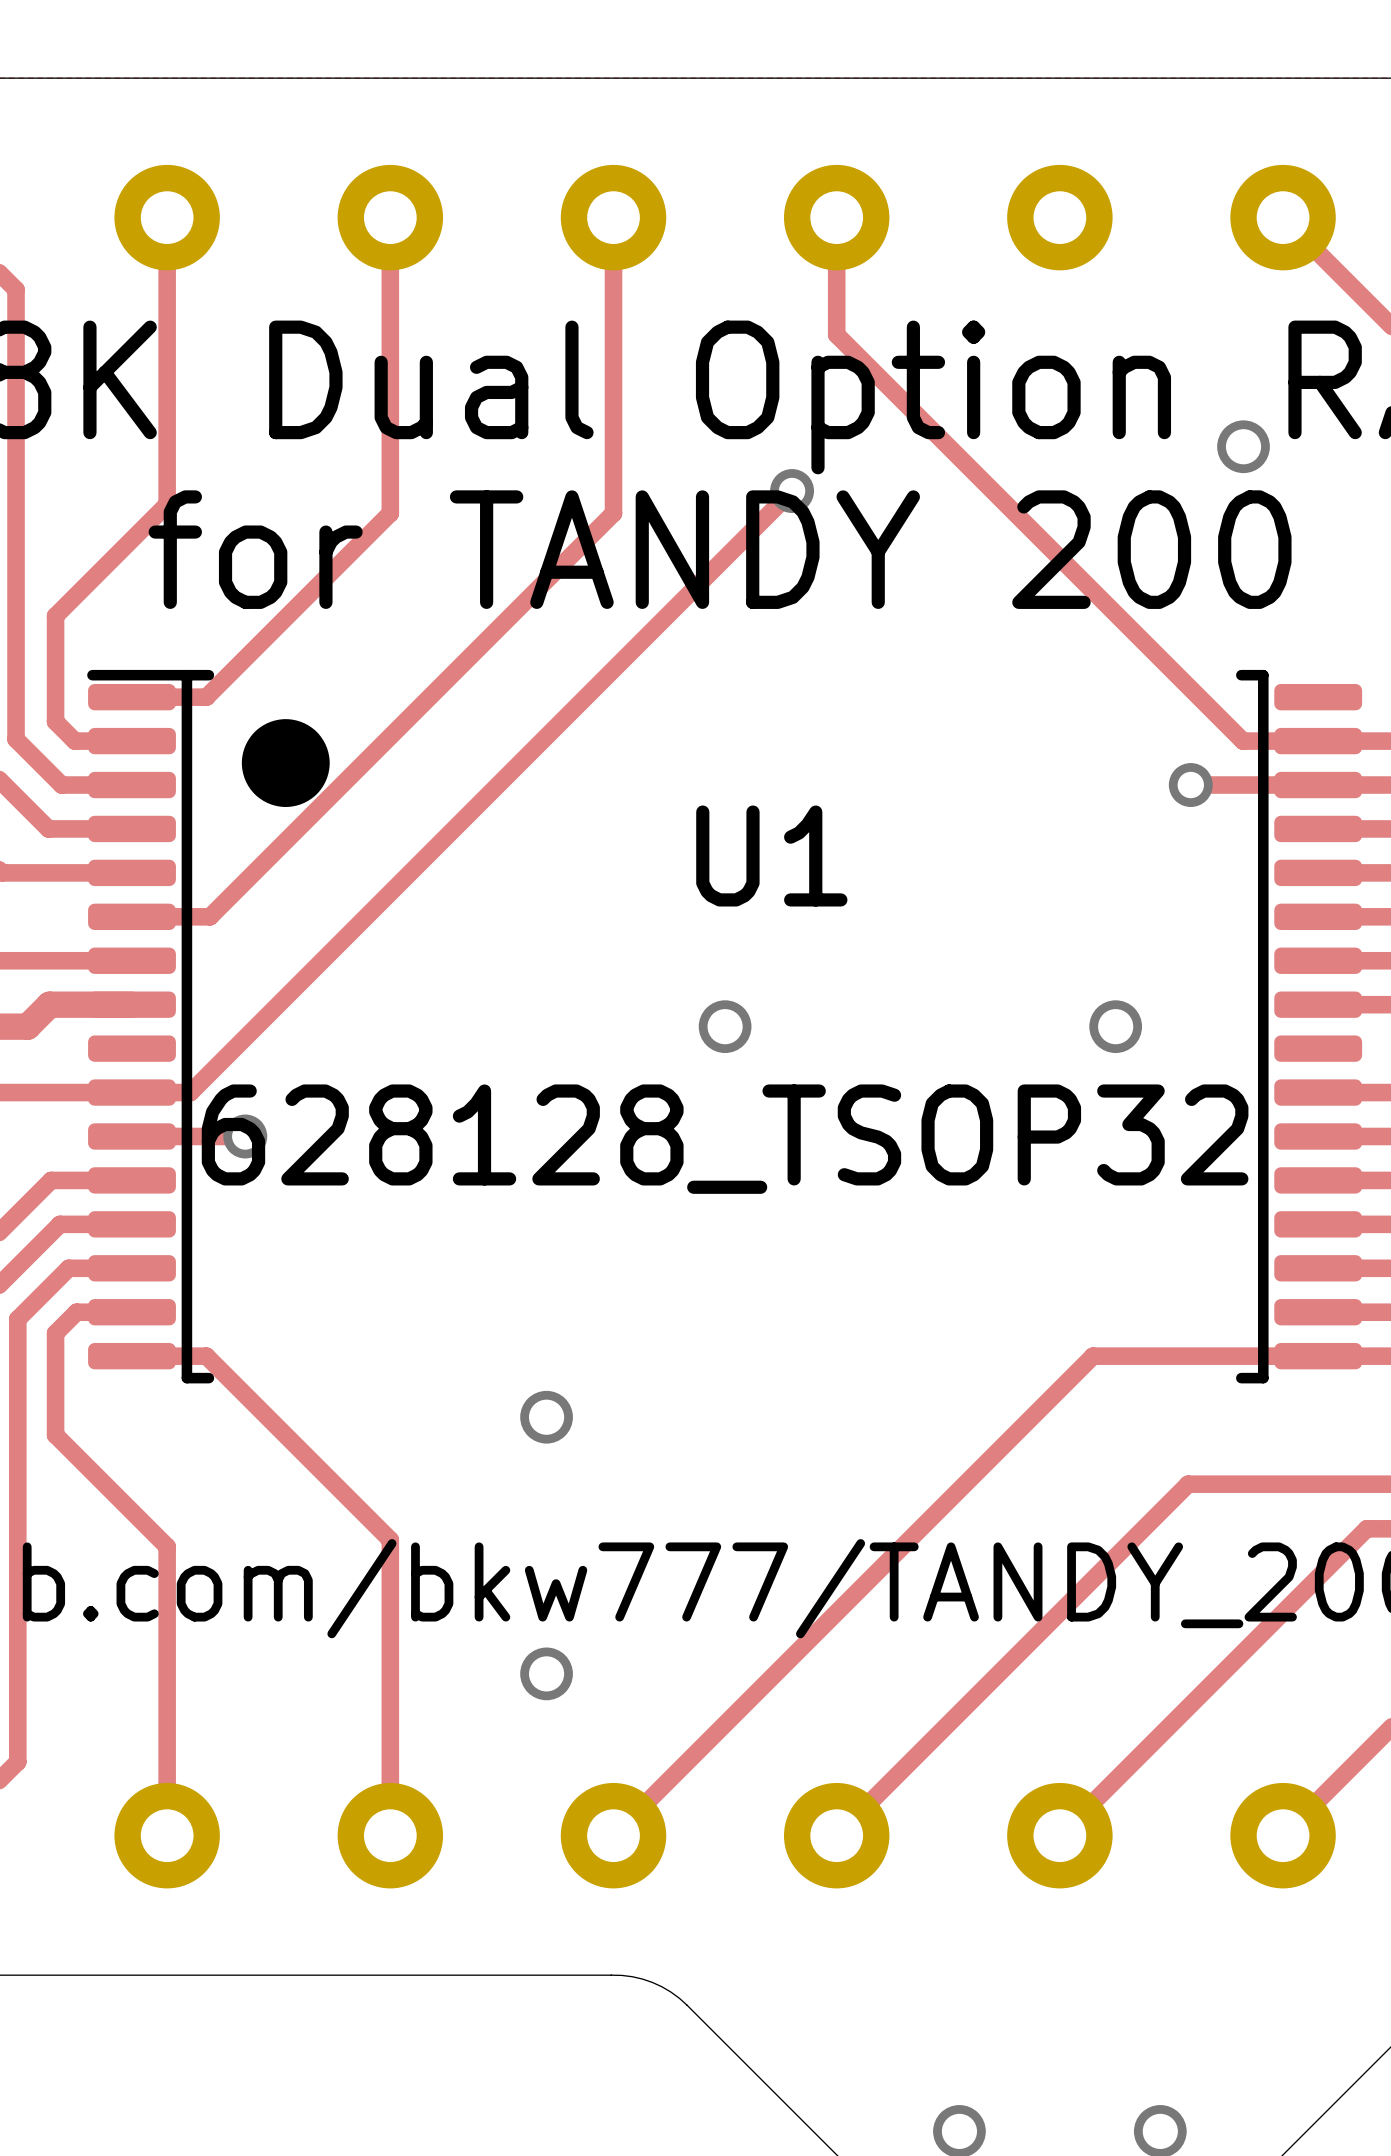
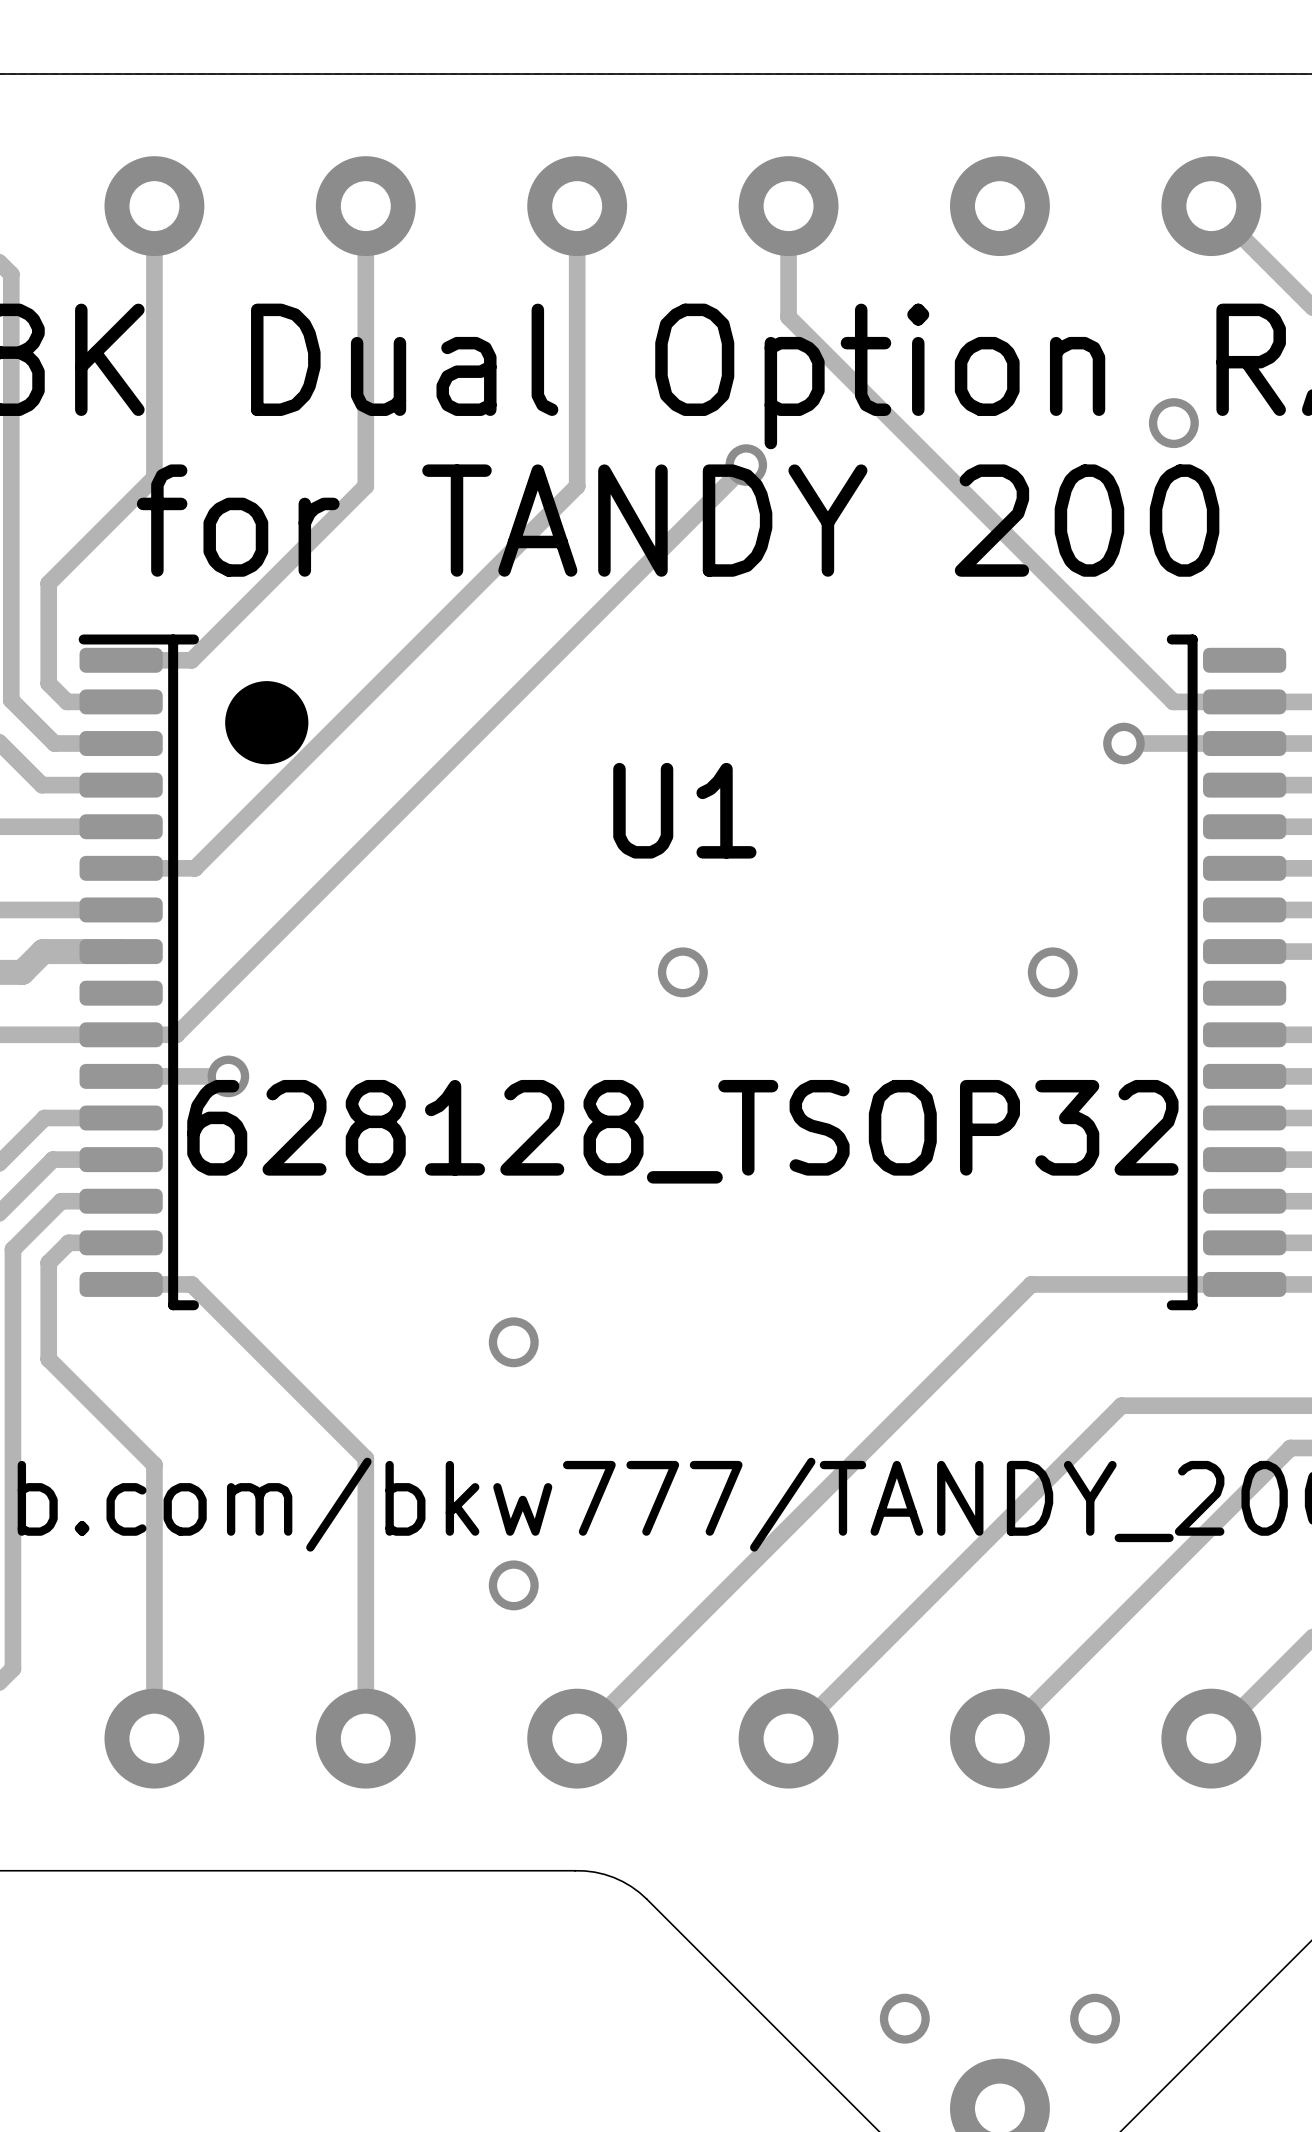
U1 name position: U1 (771, 855) -> U1 (684, 810)
U1 value position: 628128_TSOP32 (725, 1139) -> 628128_TSOP32 (682, 1131)

